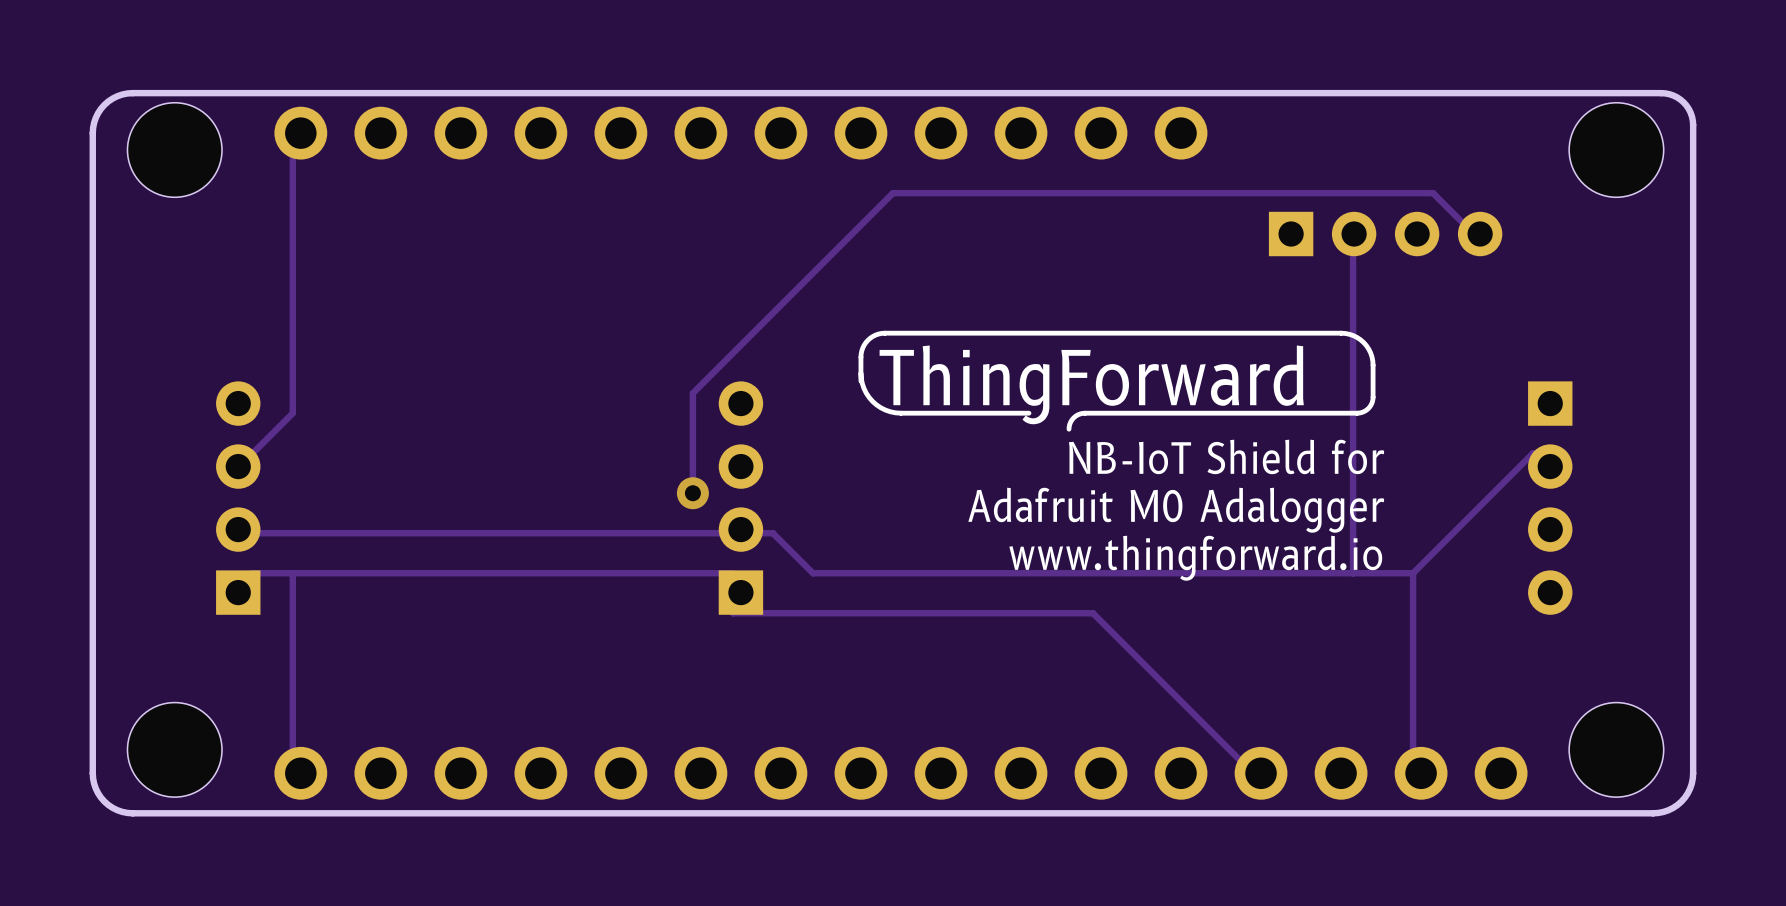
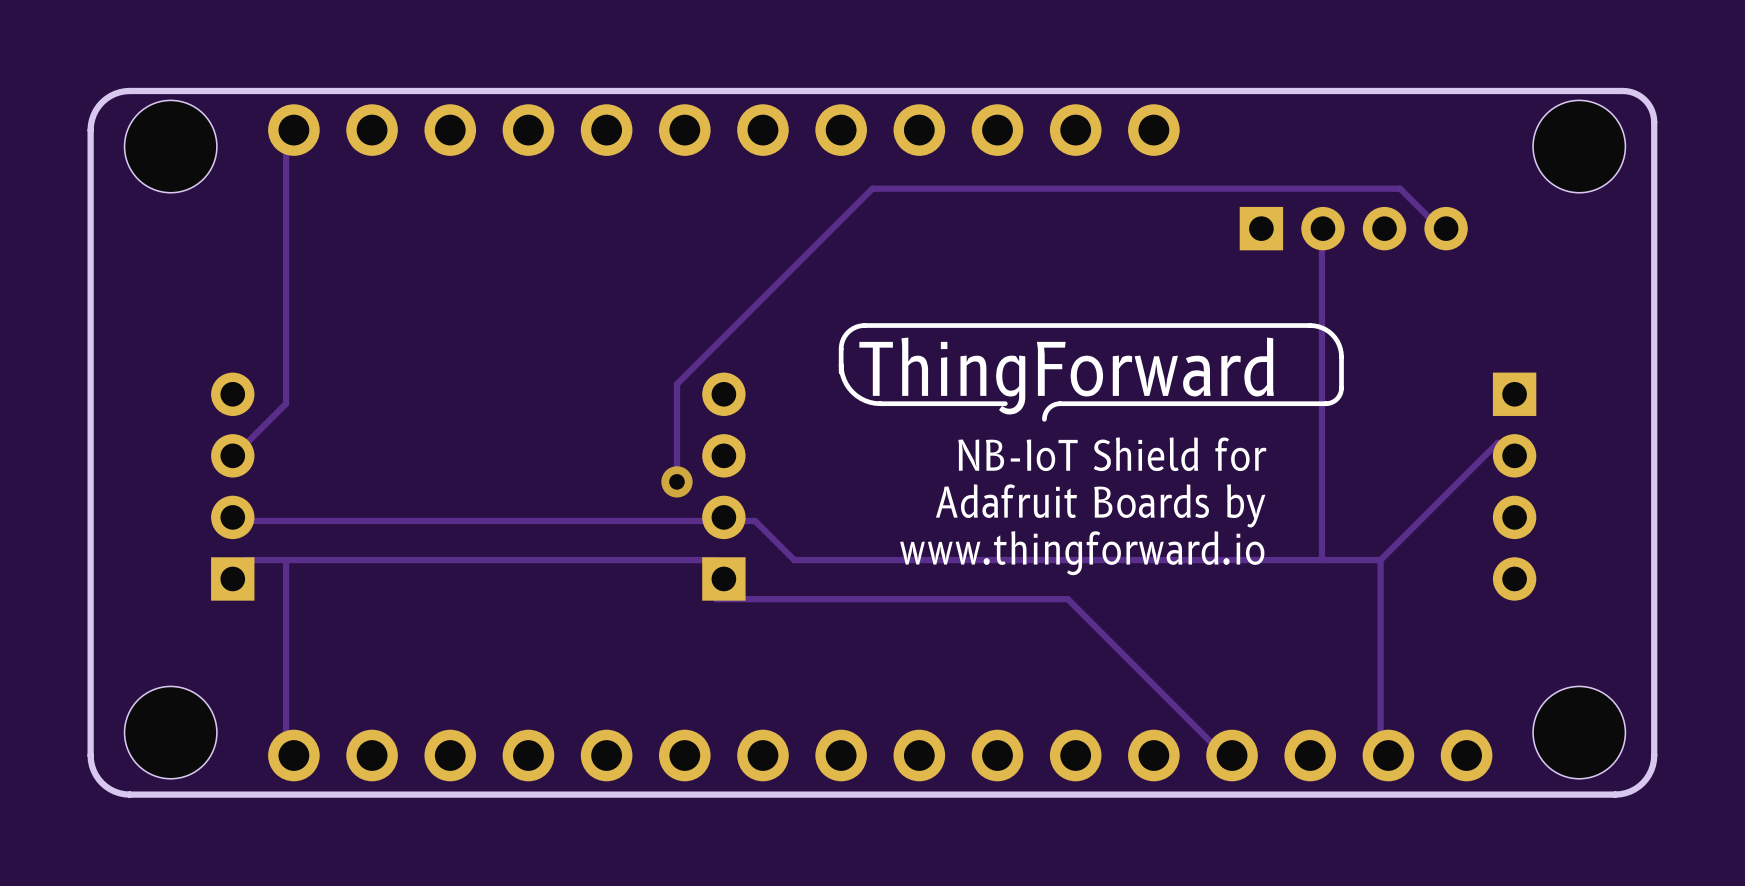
text position: NB-IoT Shield for (1226, 456) -> NB-IoT Shield for (1112, 454)
text: Adafruit M0 Adalogger (1176, 510) -> none
text: none -> Adafruit Boards by (1100, 505)
text position: www.thingforward.io (1195, 558) -> www.thingforward.io (1082, 553)

